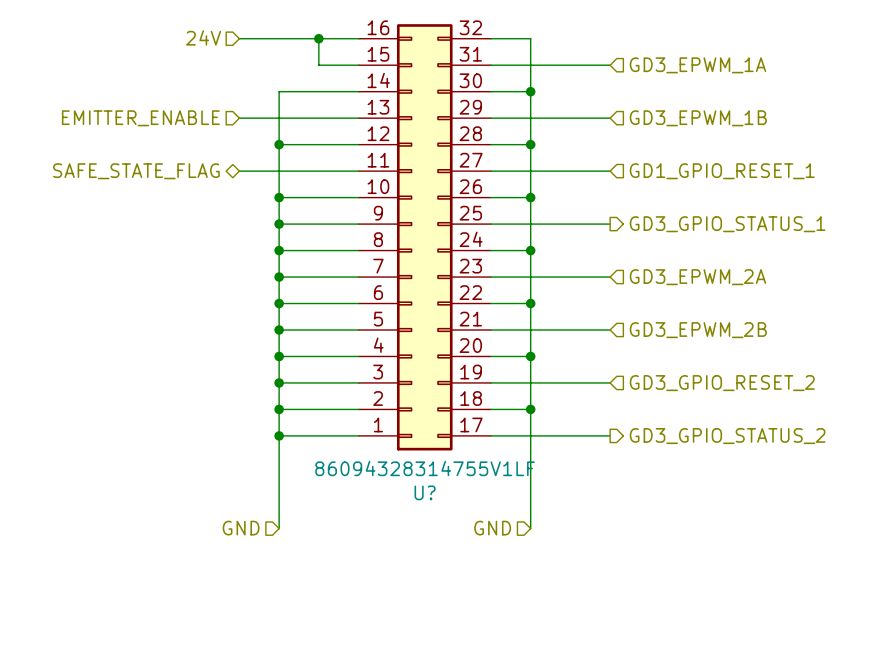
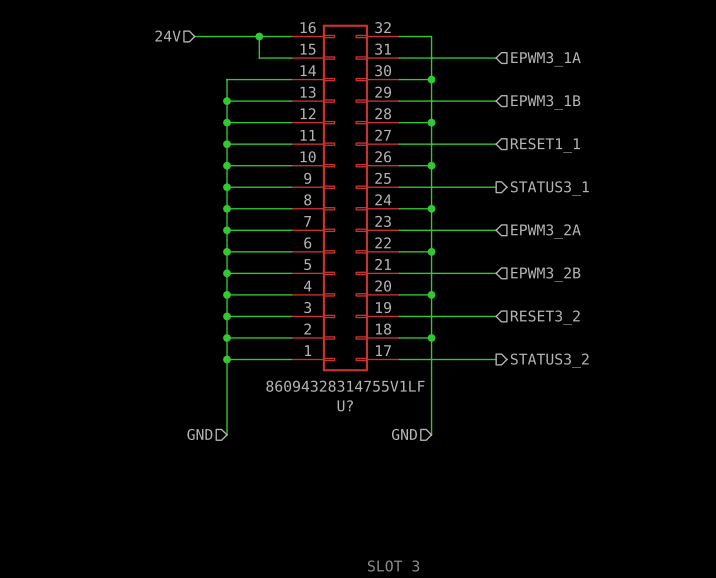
hierarchical label: GD3_EPWM_1A (697, 65) -> EPWM3_1A (545, 59)
hierarchical label: EMITTER_ENABLE (140, 118) -> none
wire: (239, 118) (279, 118) -> none
junction: none -> (227, 101)
hierarchical label: GD3_EPWM_1B (698, 118) -> EPWM3_1B (545, 102)
hierarchical label: SAFE_STATE_FLAG (136, 171) -> none
wire: (239, 171) (279, 171) -> none
junction: none -> (227, 144)
hierarchical label: GD1_GPIO_RESET_1 (722, 171) -> RESET1_1 (545, 145)
hierarchical label: GD3_GPIO_STATUS_1 (727, 224) -> STATUS3_1 (549, 188)
hierarchical label: GD3_EPWM_2A (697, 277) -> EPWM3_2A (545, 231)
hierarchical label: GD3_EPWM_2B (698, 330) -> EPWM3_2B (545, 274)
hierarchical label: GD3_GPIO_RESET_2 (722, 383) -> RESET3_2 (545, 317)
hierarchical label: GD3_GPIO_STATUS_2 (727, 436) -> STATUS3_2 (549, 360)

